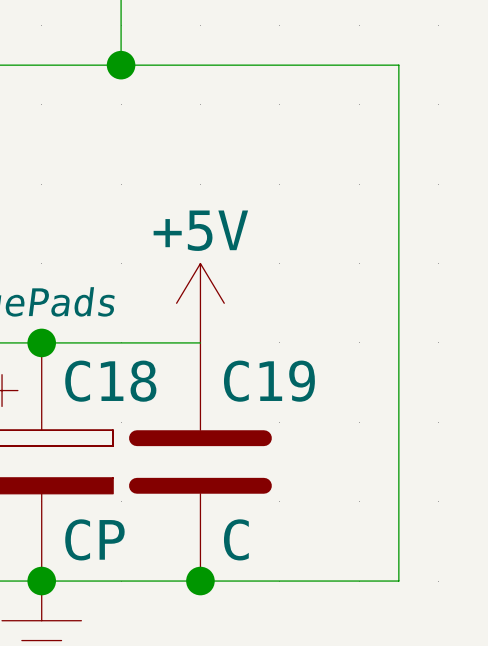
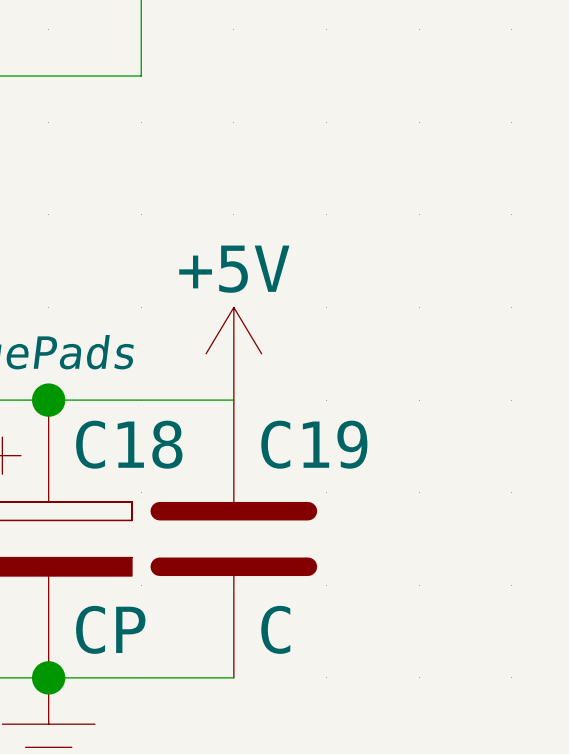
wire: (121, 65) (398, 65) (398, 581) (200, 581) -> none
junction: (121, 65) -> none
junction: (200, 581) -> none

